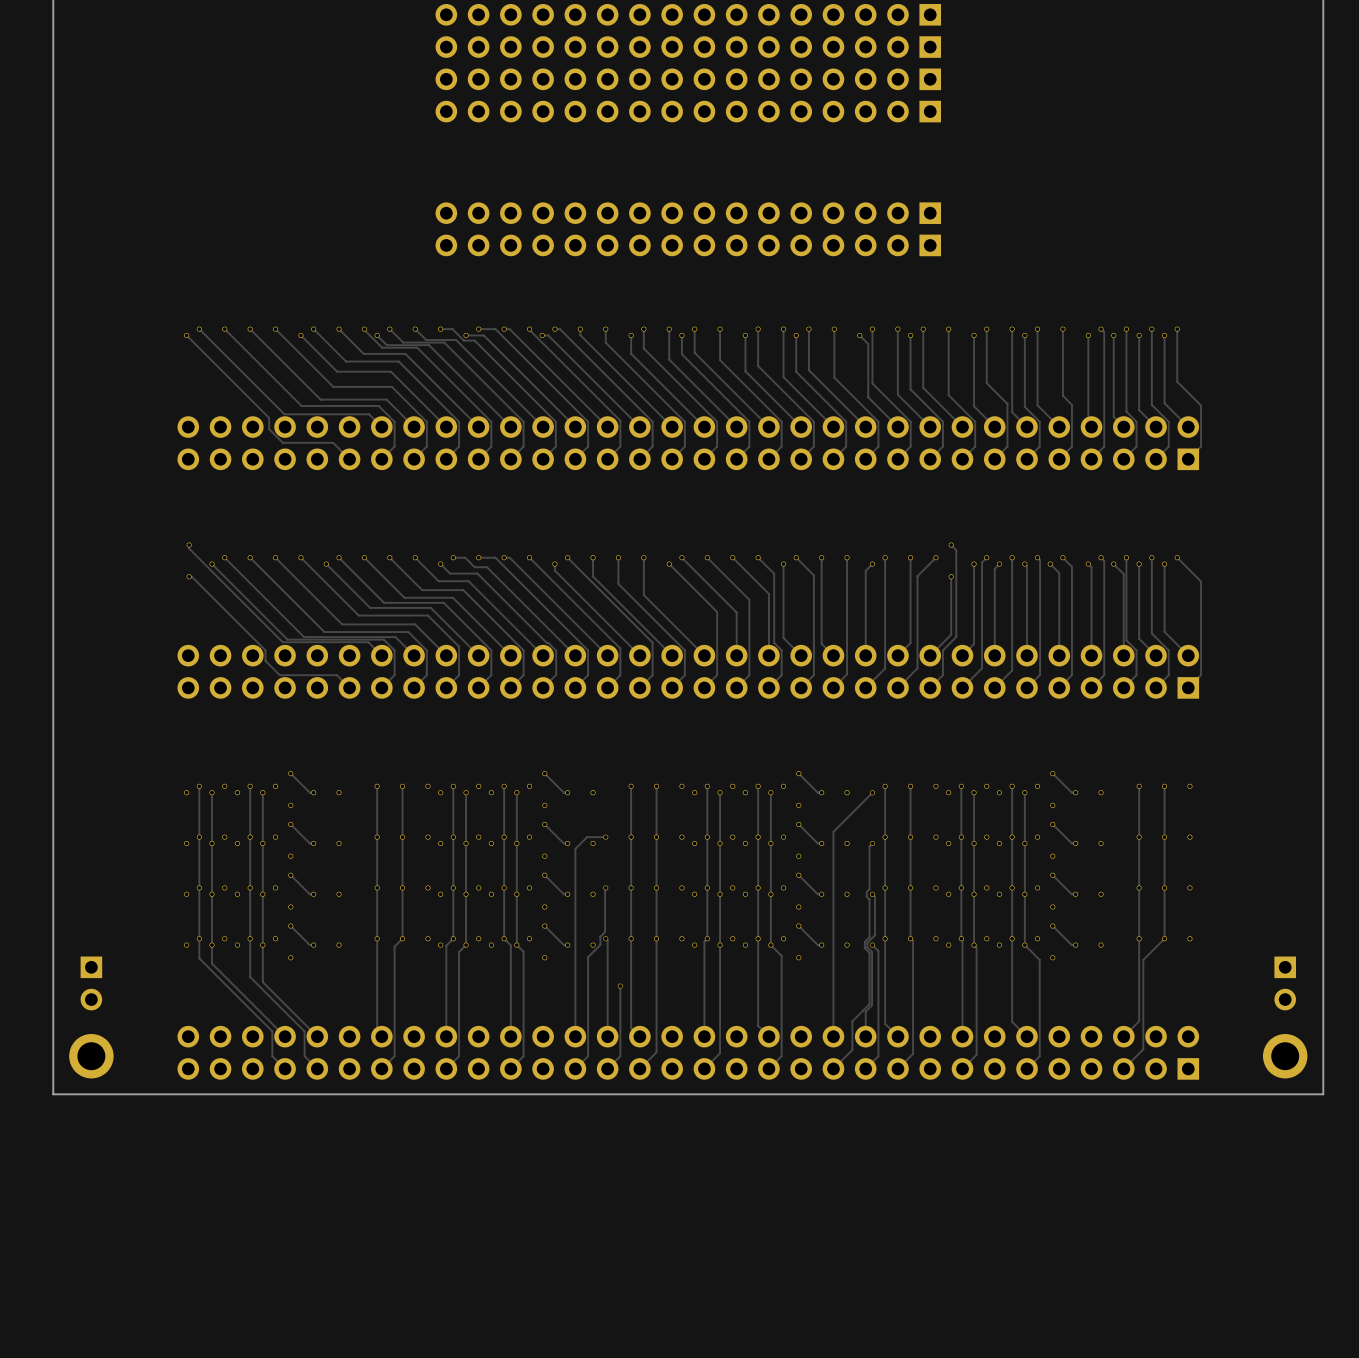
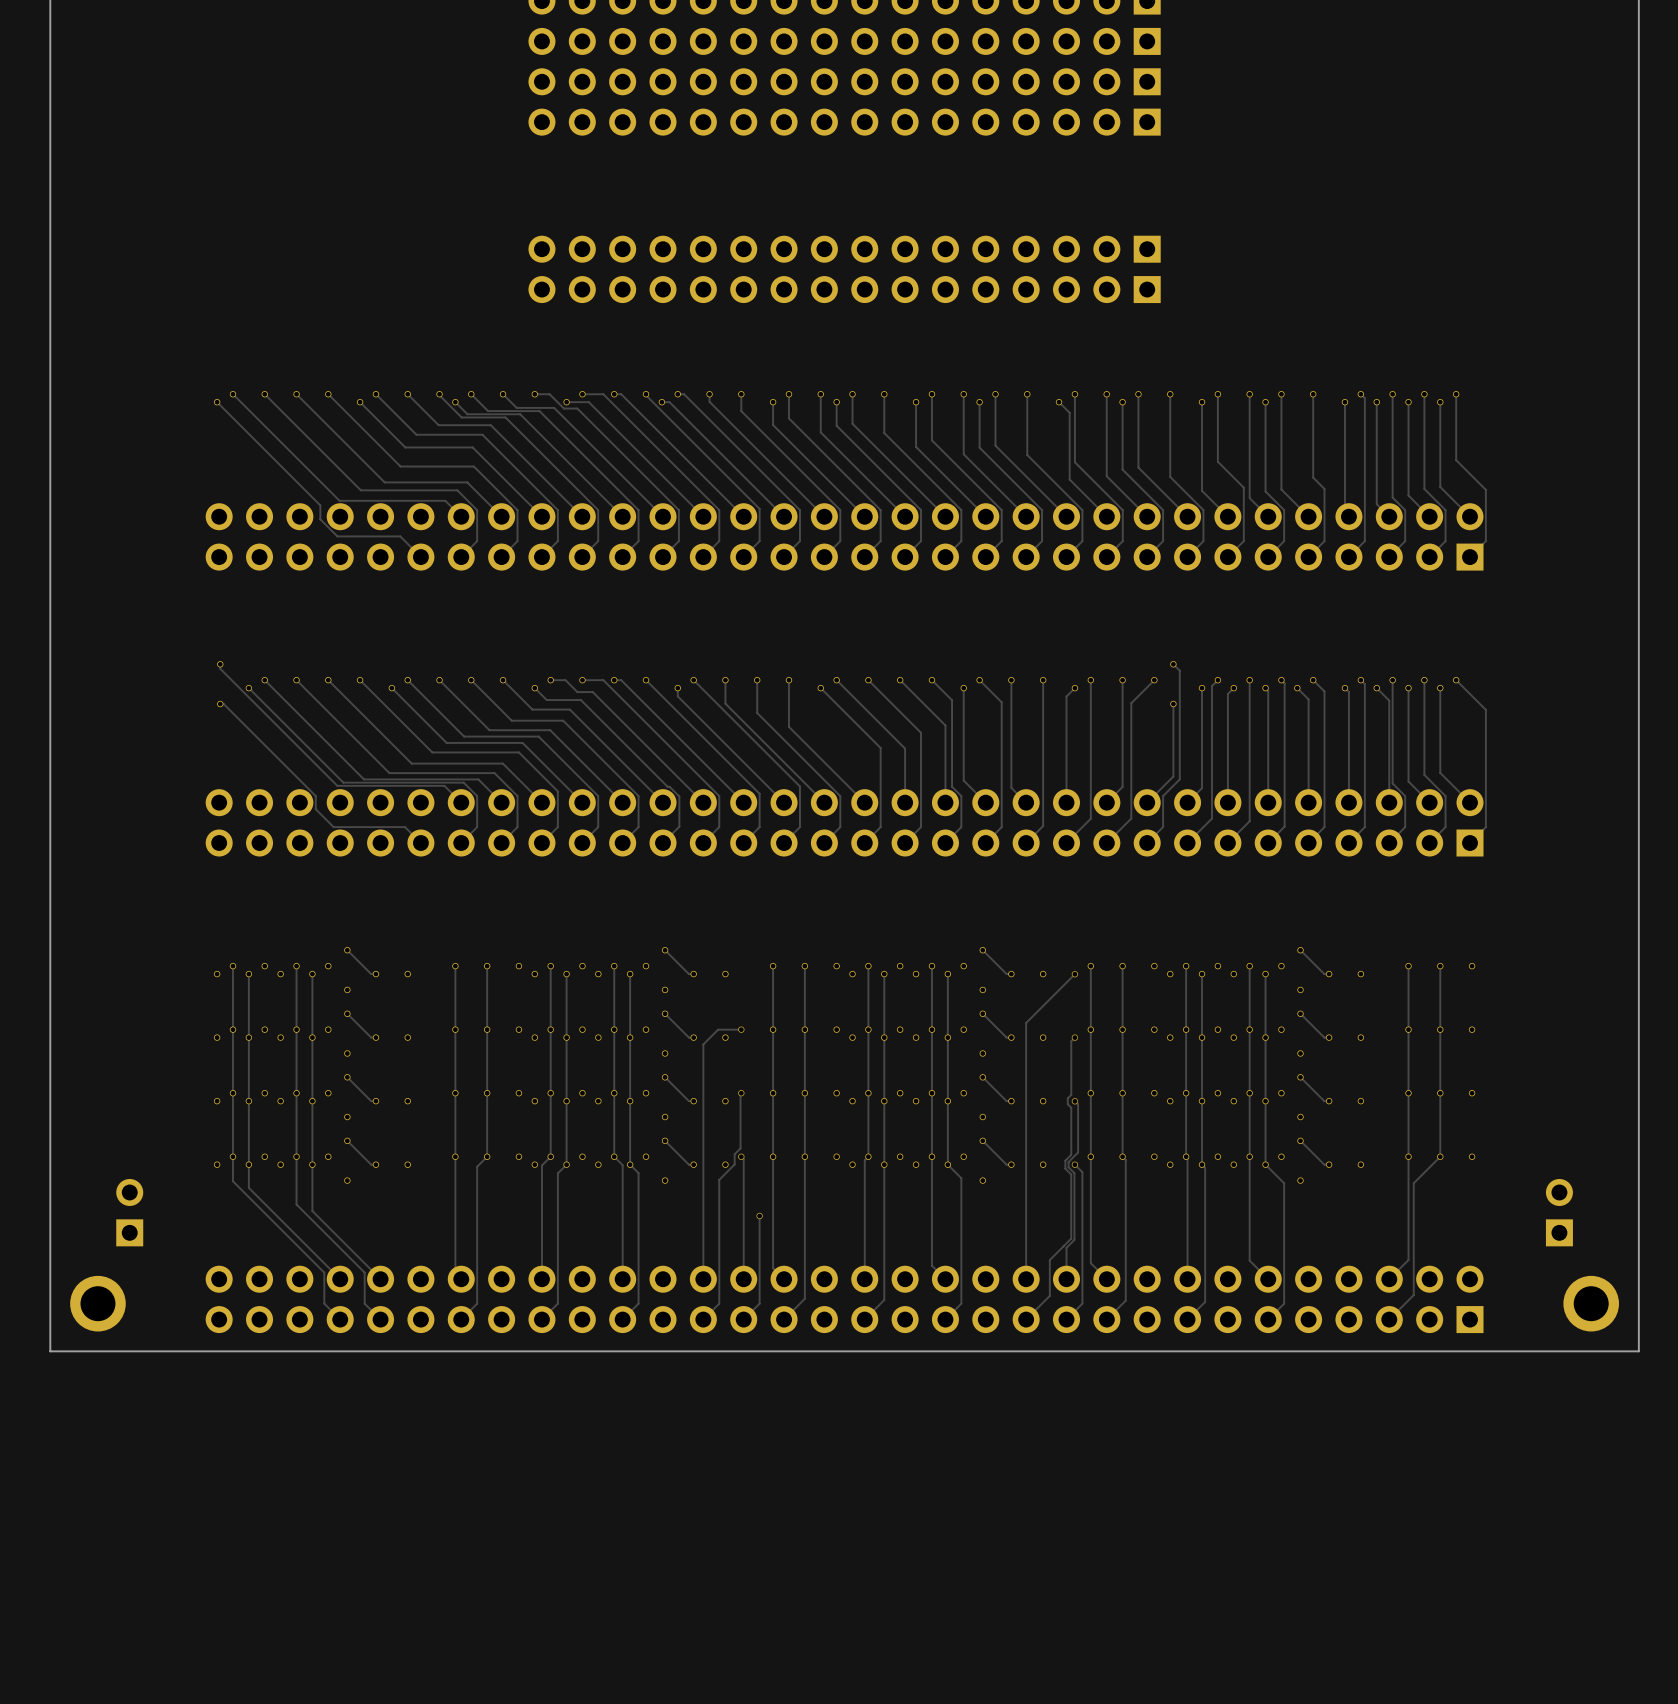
part rotation: 0° (91, 983) -> 180° (129, 1212)
part rotation: 0° (1285, 983) -> 180° (1559, 1212)

